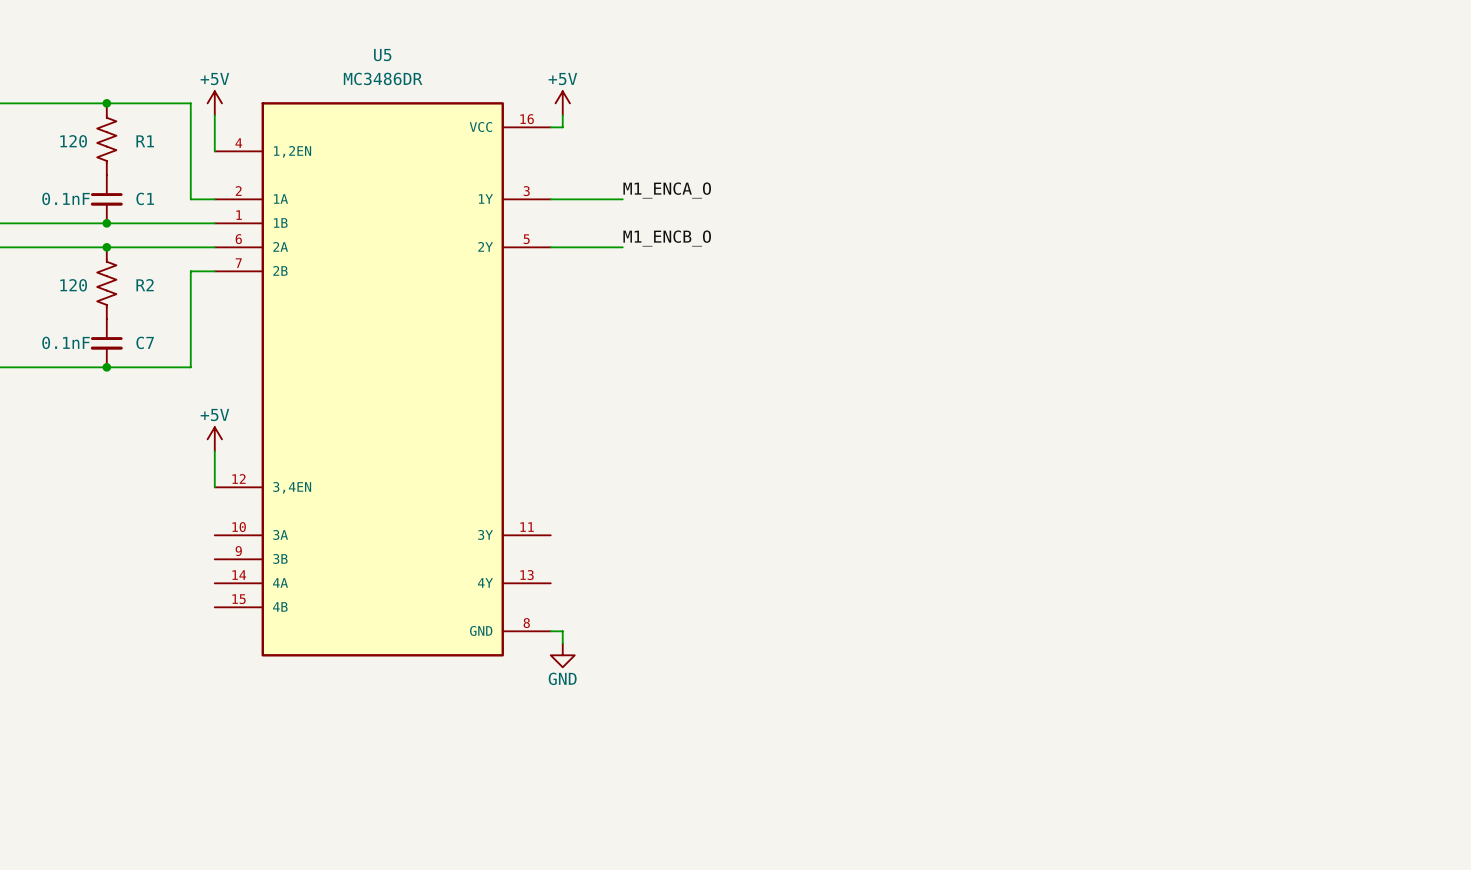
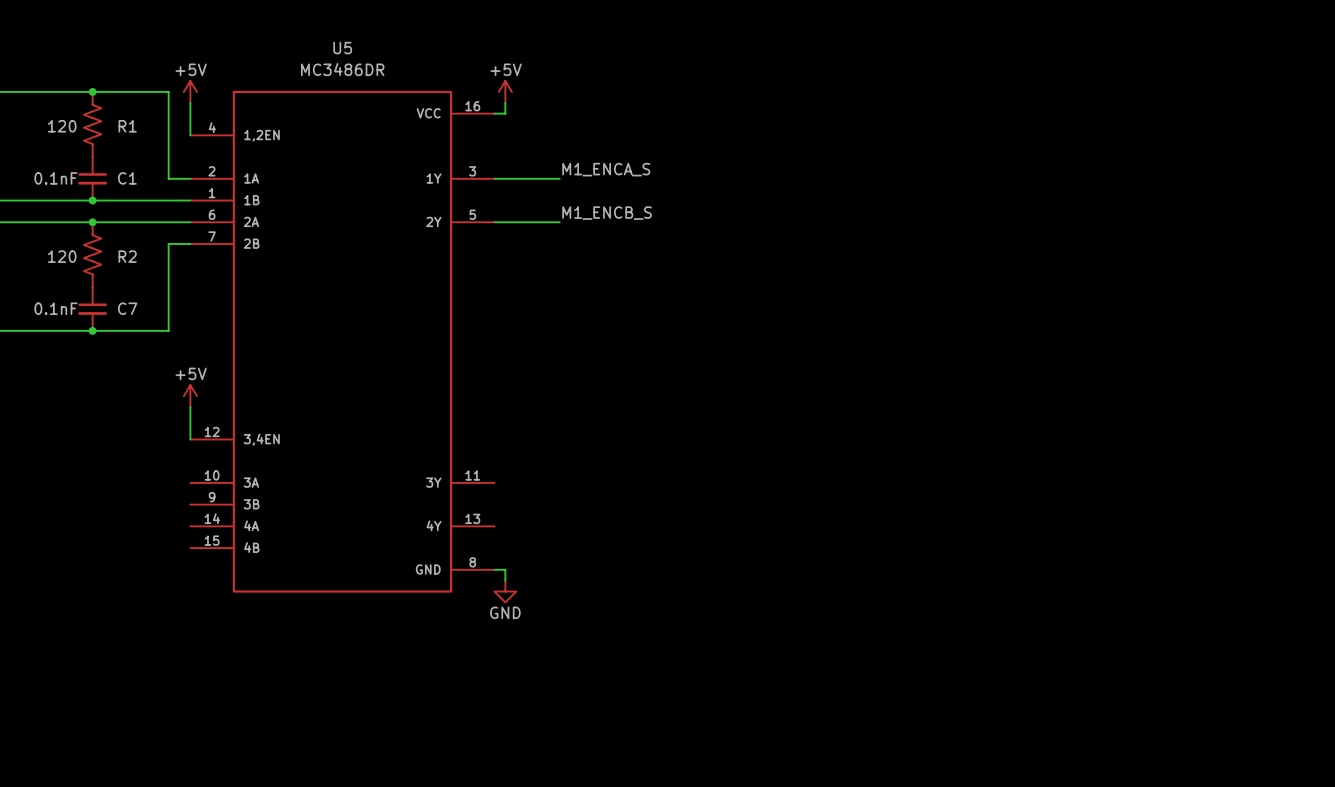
label: M1_ENCA_O (667, 190) -> M1_ENCA_S (606, 169)
label: M1_ENCB_O (667, 238) -> M1_ENCB_S (607, 213)

